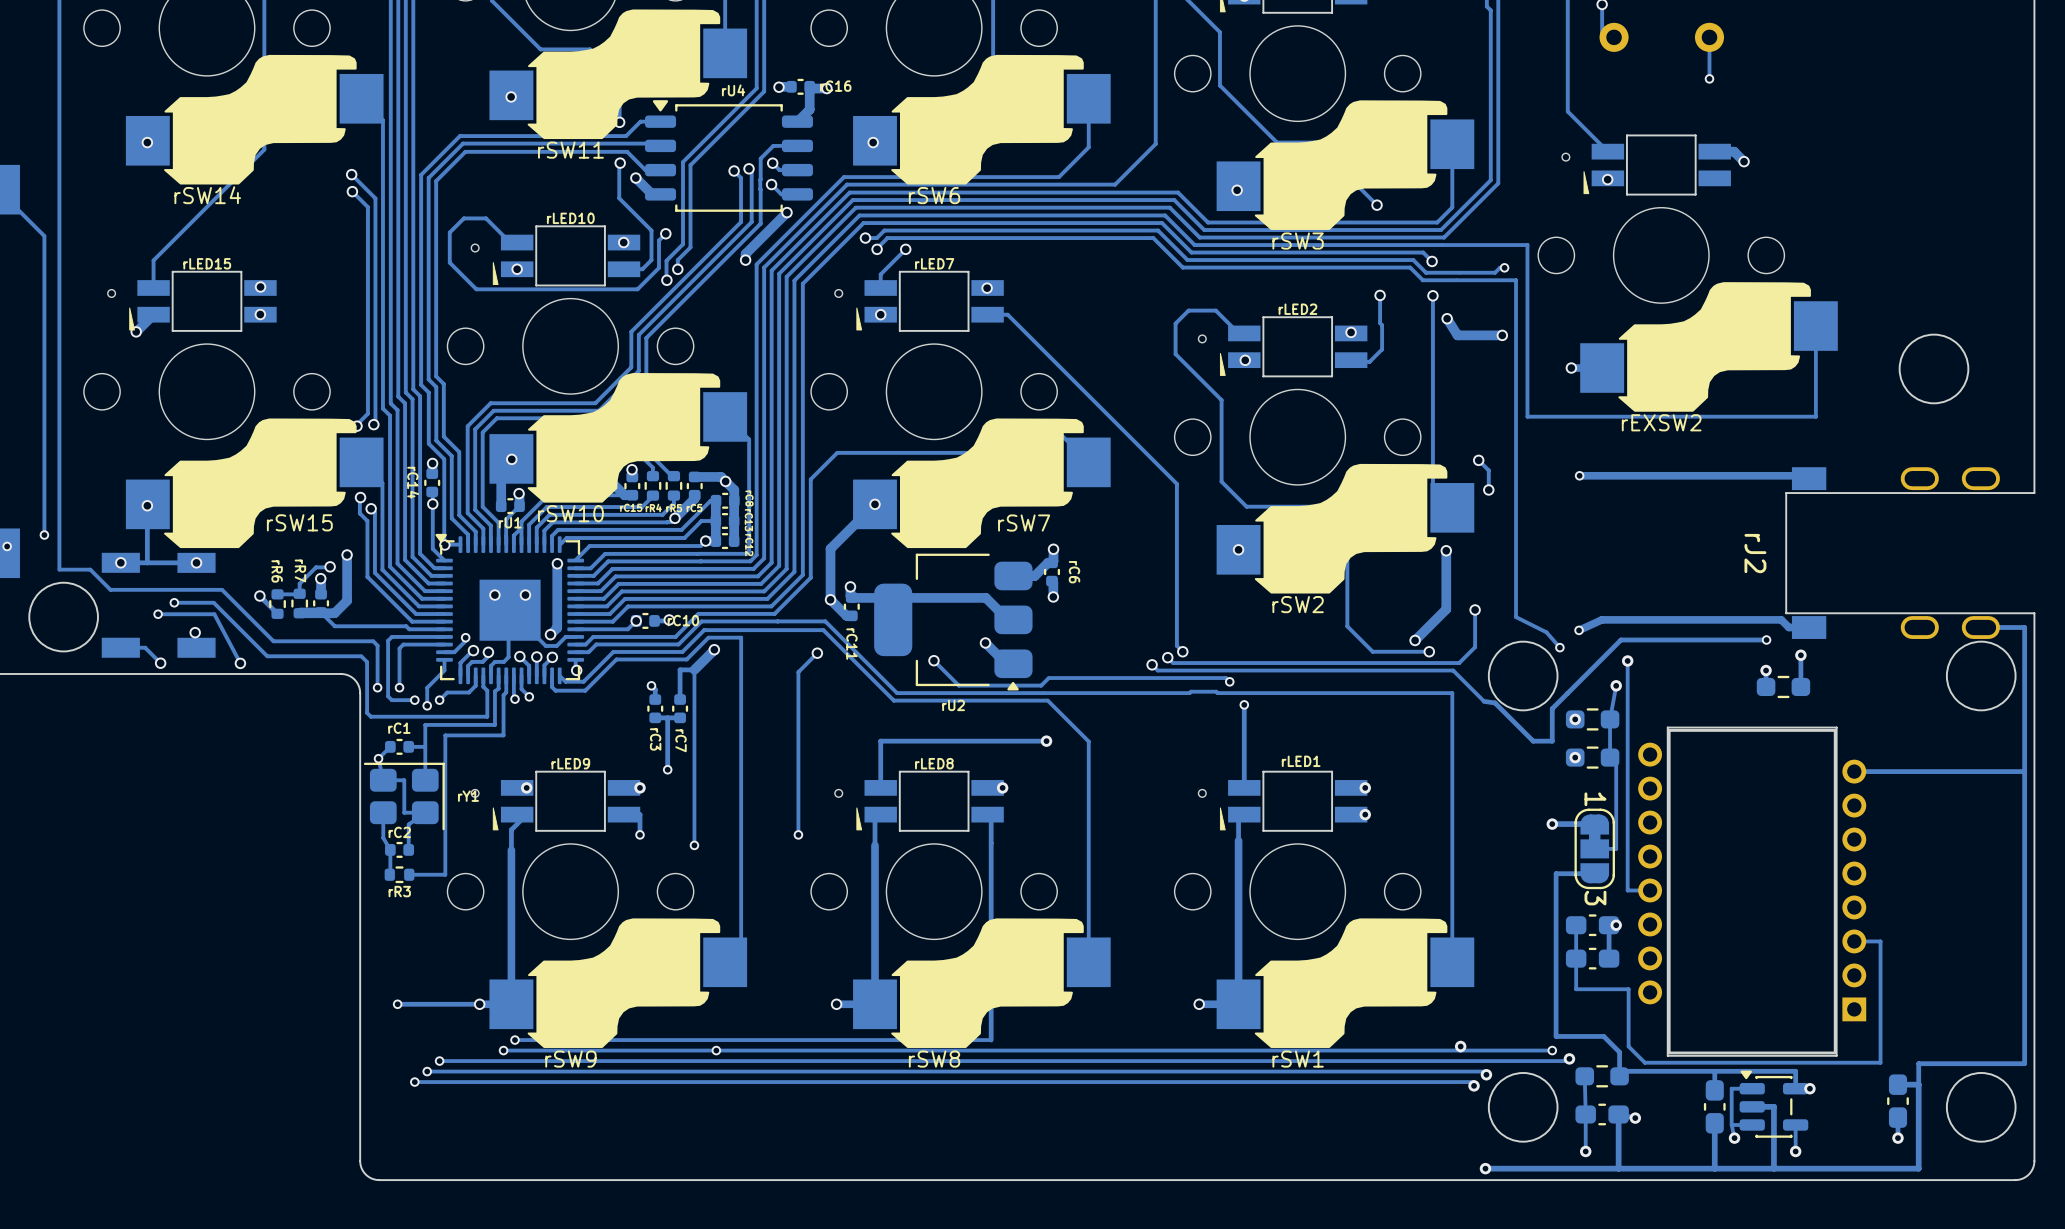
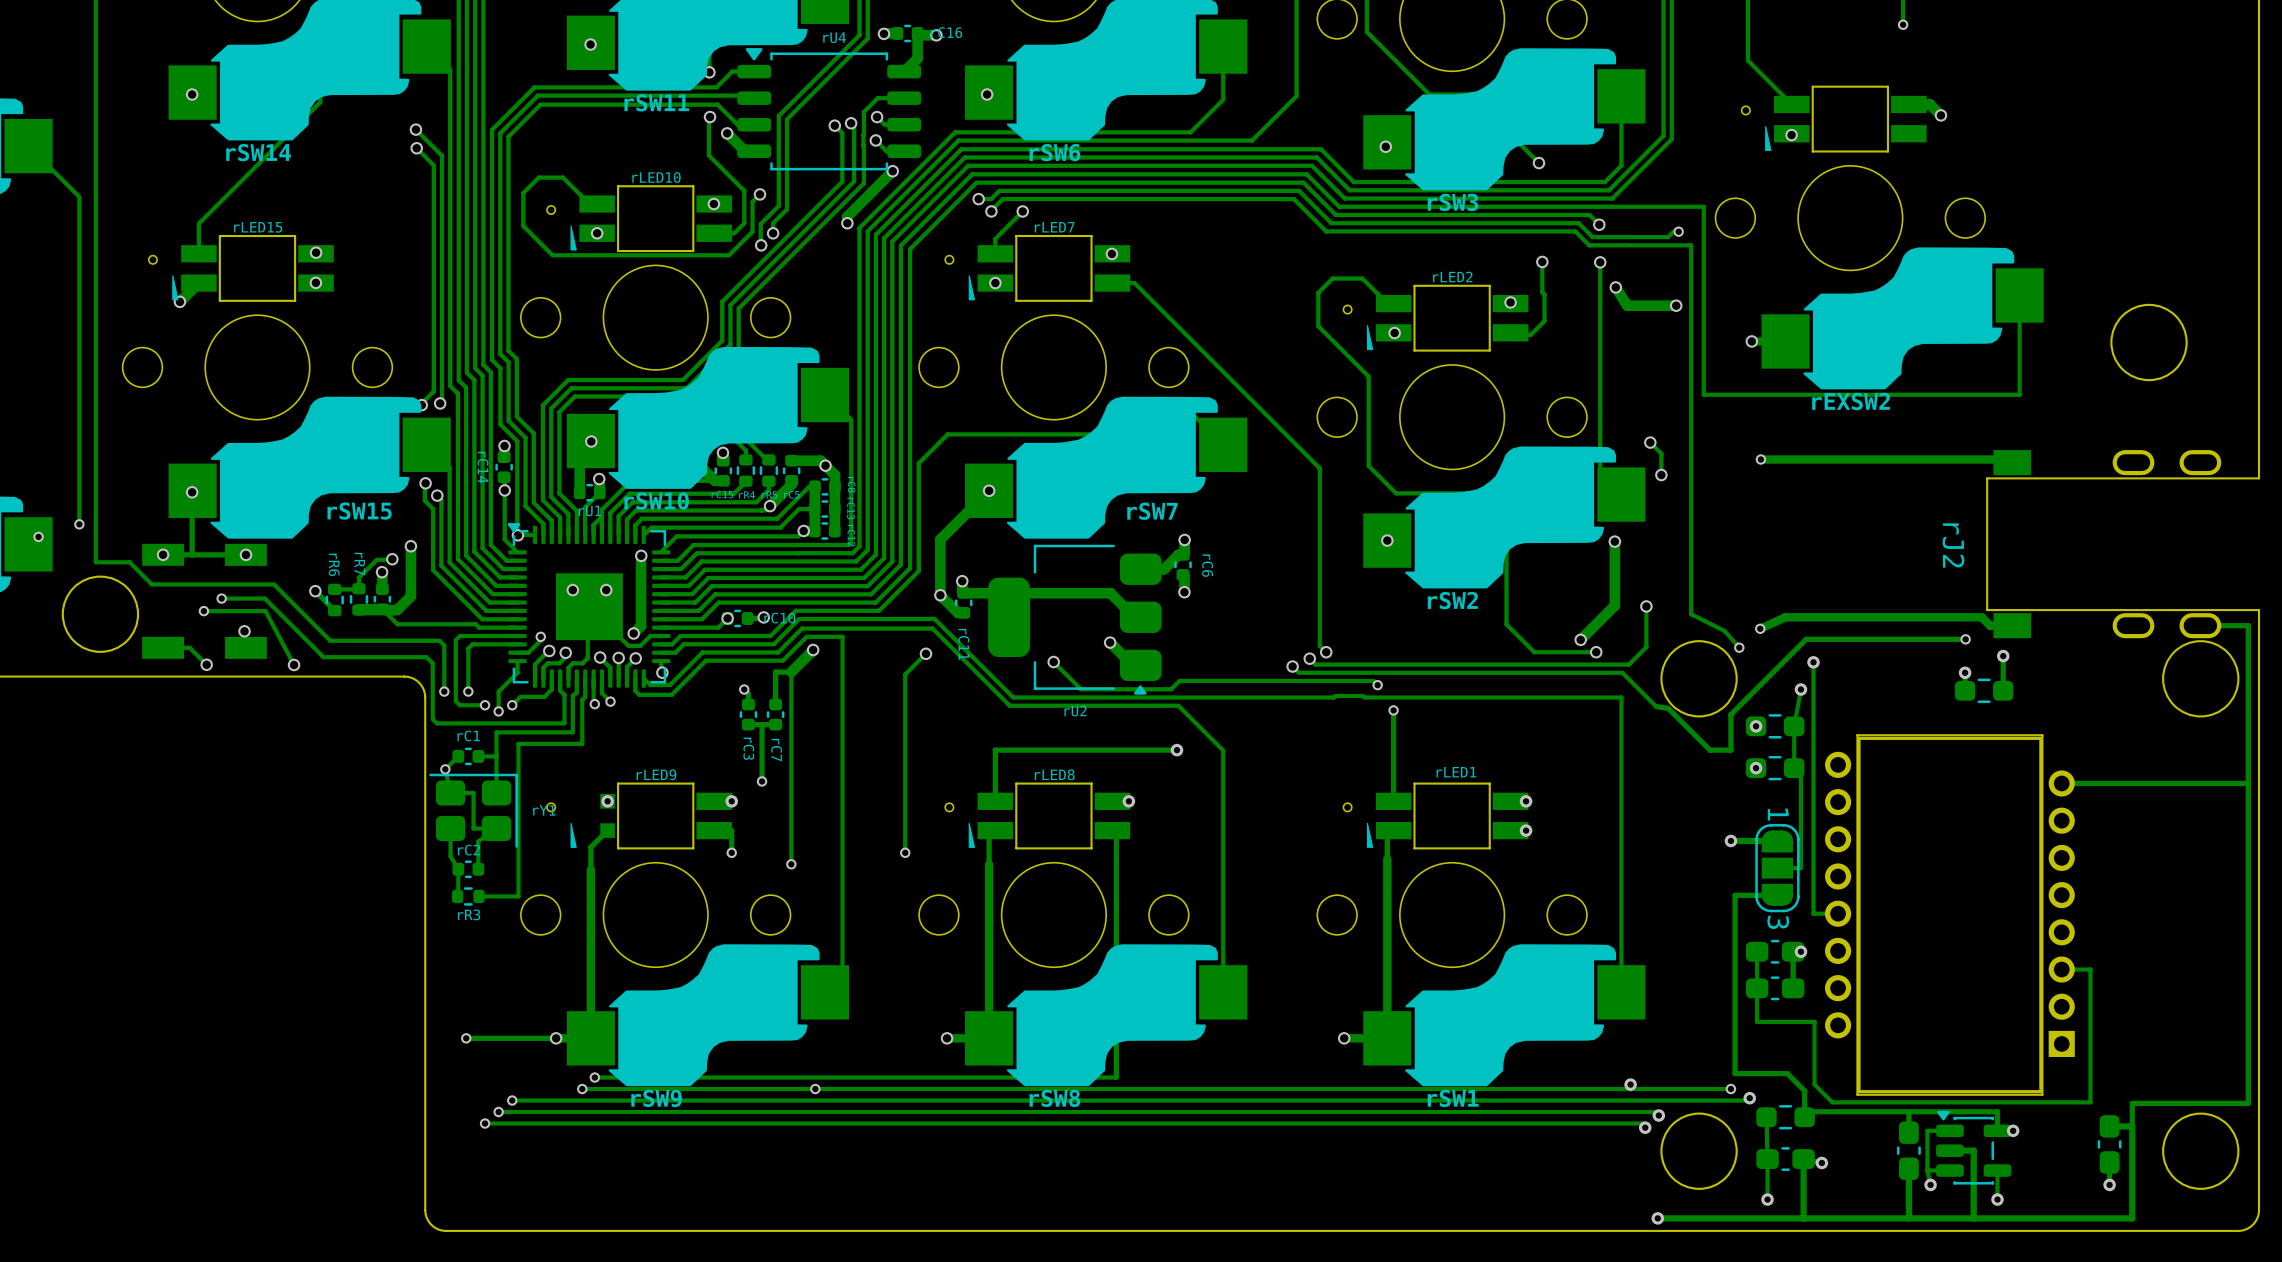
rLED9 footprint: [492, 770, 641, 832] -> [570, 782, 732, 850]
part footprint: [1574, 808, 1615, 890] -> [1755, 824, 1800, 913]

